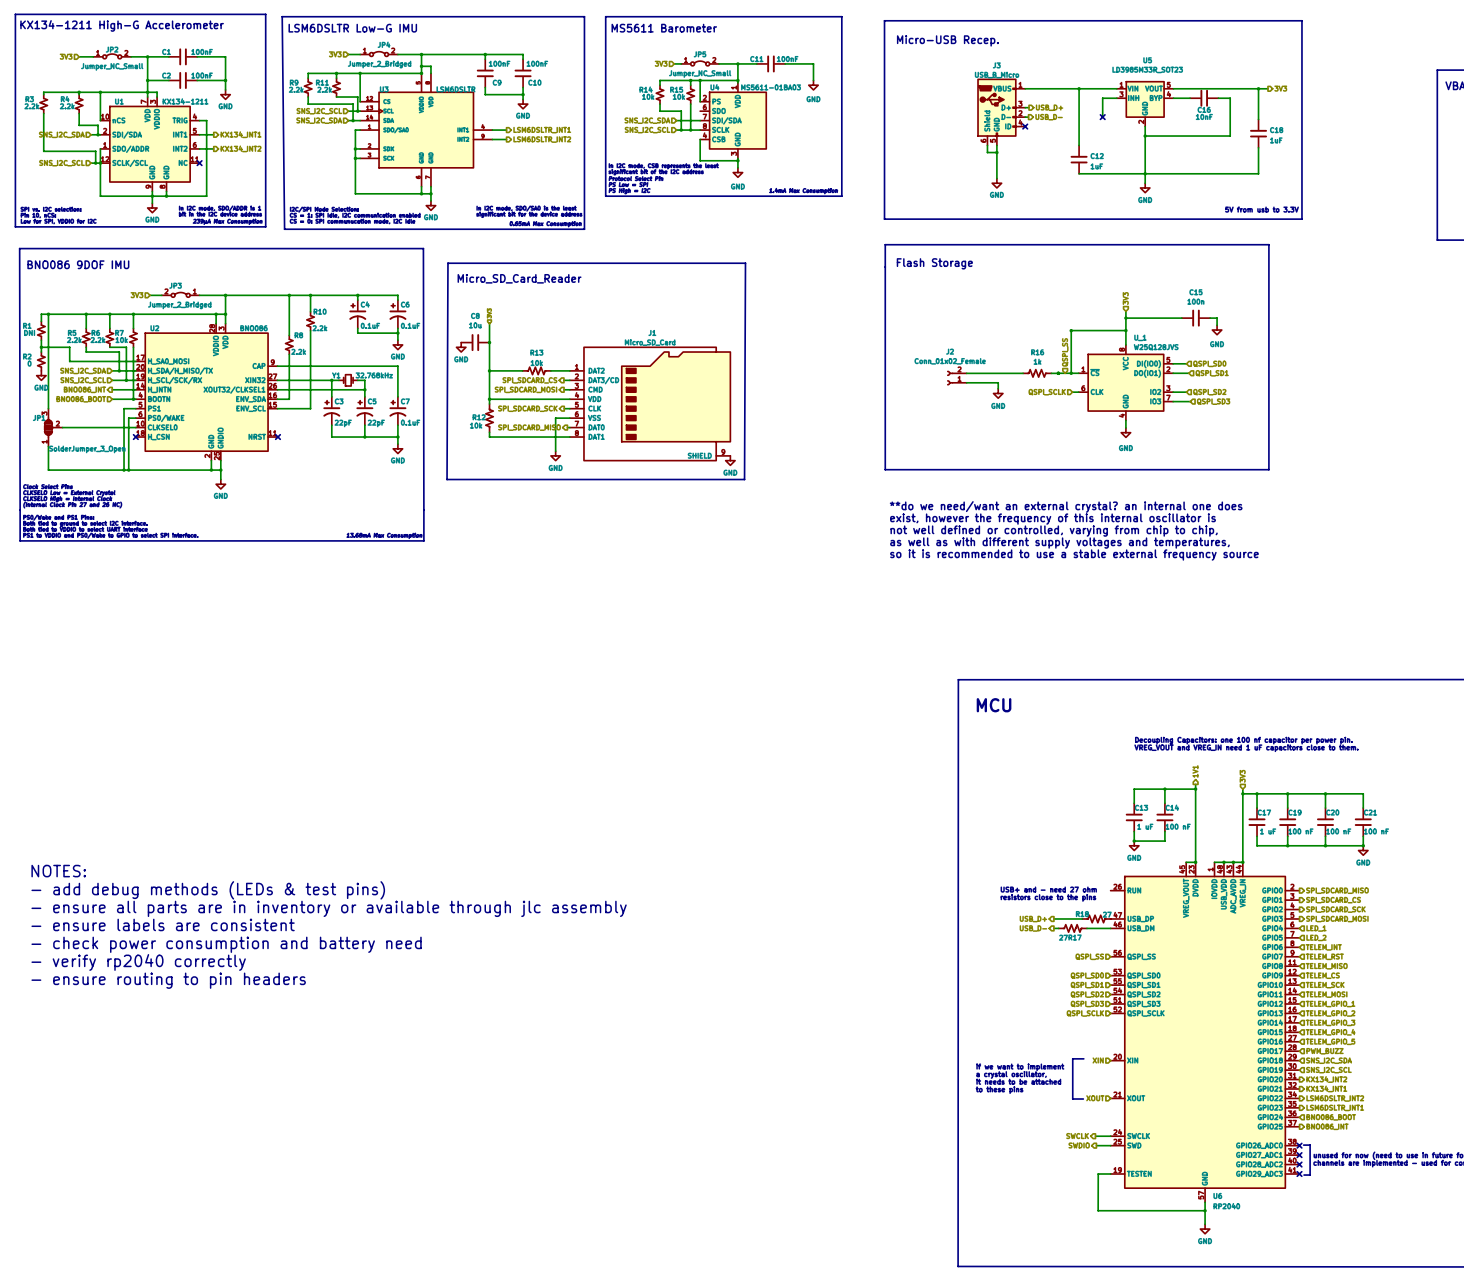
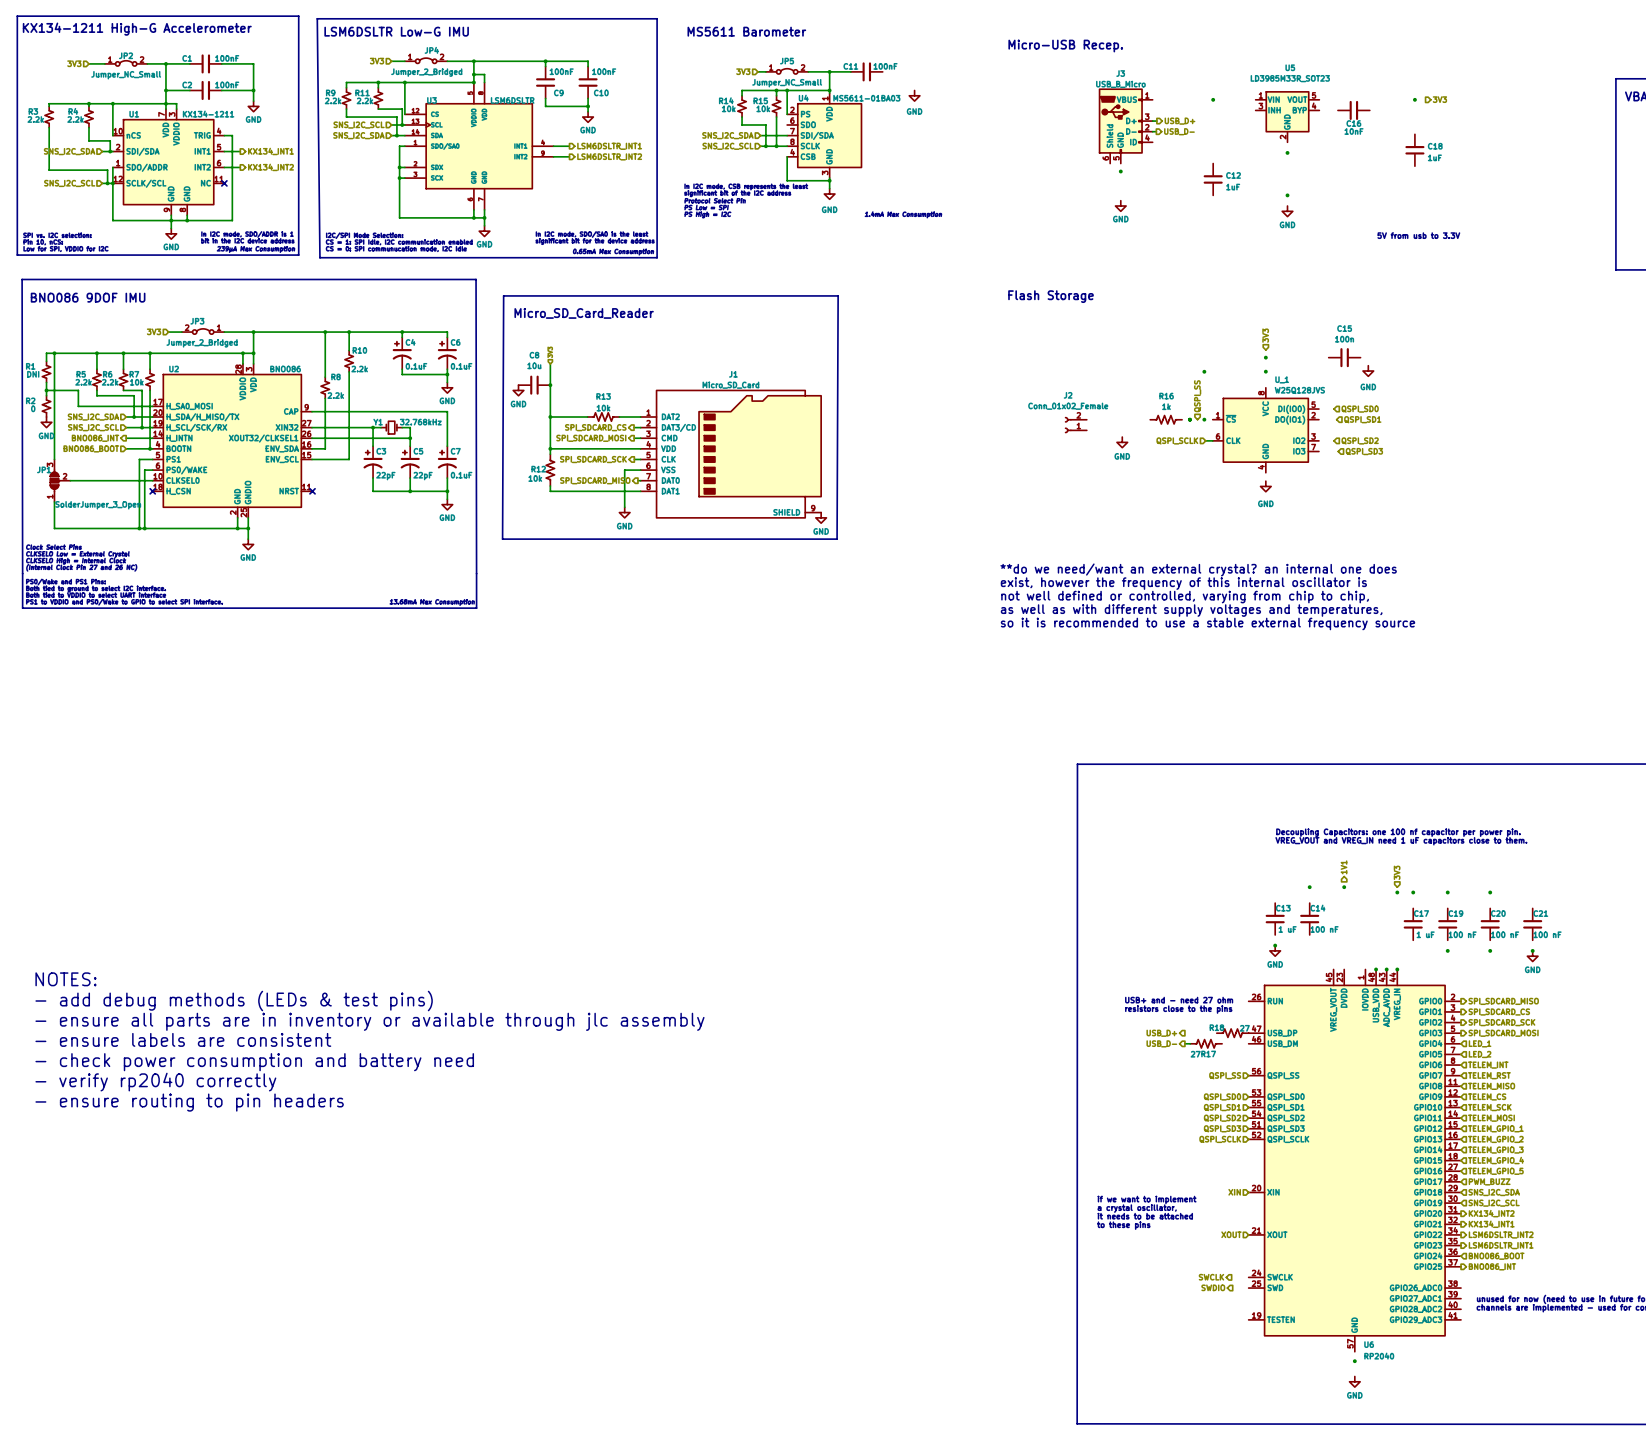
line: (605, 16) (841, 16) (841, 196) (605, 196) (605, 16) -> none
line: (884, 20) (884, 219) (1301, 219) (1301, 20) (884, 20) -> none
wire: (785, 63) (813, 63) (813, 80) -> none
wire: (1025, 88) (1116, 88) -> none
wire: (1079, 88) (1079, 145) -> none
wire: (1173, 88) (1267, 88) -> none
wire: (1258, 88) (1258, 119) -> none
wire: (1116, 98) (1102, 98) (1102, 117) -> none
wire: (1173, 98) (1190, 98) -> none
wire: (1218, 98) (1230, 98) (1230, 136) (1145, 136) -> none
no-connect mark: (1102, 117) -> none
no-connect mark: (1025, 126) -> none
wire: (1145, 126) (1145, 183) -> none
wire: (987, 145) (987, 152) (996, 152) -> none
wire: (996, 145) (996, 178) -> none
wire: (1258, 147) (1258, 173) (1079, 173) -> none
line: (885, 244) (885, 469) (1268, 469) (1268, 244) (885, 244) -> none
wire: (1125, 311) (1125, 344) -> none
wire: (1125, 318) (1181, 318) -> none
wire: (1210, 318) (1217, 318) (1217, 325) -> none
wire: (1071, 330) (1125, 330) -> none
wire: (1071, 330) (1071, 373) -> none
wire: (1173, 363) (1186, 363) -> none
wire: (966, 373) (1023, 373) -> none
wire: (1078, 373) (1051, 373) -> none
wire: (1173, 373) (1188, 373) -> none
wire: (966, 382) (998, 382) (998, 388) -> none
wire: (1173, 392) (1186, 392) -> none
wire: (1173, 401) (1190, 401) -> none
wire: (1125, 420) (1125, 427) -> none
text: MCU (994, 705) -> none
wire: (1195, 784) (1195, 862) (1186, 862) -> none
wire: (1164, 789) (1164, 803) -> none
wire: (1195, 789) (1134, 789) (1134, 803) -> none
wire: (1242, 789) (1242, 862) (1214, 862) -> none
wire: (1242, 793) (1363, 793) (1363, 808) -> none
wire: (1257, 793) (1257, 808) -> none
wire: (1287, 793) (1287, 808) -> none
wire: (1325, 793) (1325, 808) -> none
wire: (1134, 831) (1134, 841) (1164, 841) (1164, 831) -> none
wire: (1257, 836) (1257, 845) (1363, 845) (1363, 836) -> none
wire: (1287, 836) (1287, 845) -> none
wire: (1325, 836) (1325, 845) -> none
junction: (1195, 862) -> none
wire: (1053, 918) (1082, 918) -> none
wire: (1087, 928) (1110, 928) -> none
line: (1083, 1058) (1072, 1058) (1072, 1099) (1083, 1099) -> none
wire: (1095, 1136) (1110, 1136) -> none
wire: (1096, 1145) (1110, 1145) -> none
no-connect mark: (1299, 1145) -> none
line: (1303, 1145) (1310, 1145) (1310, 1175) (1304, 1175) -> none
no-connect mark: (1299, 1155) -> none
no-connect mark: (1299, 1164) -> none
wire: (1110, 1173) (1098, 1173) (1098, 1210) (1205, 1210) -> none
no-connect mark: (1299, 1173) -> none
wire: (1205, 1202) (1205, 1224) -> none

